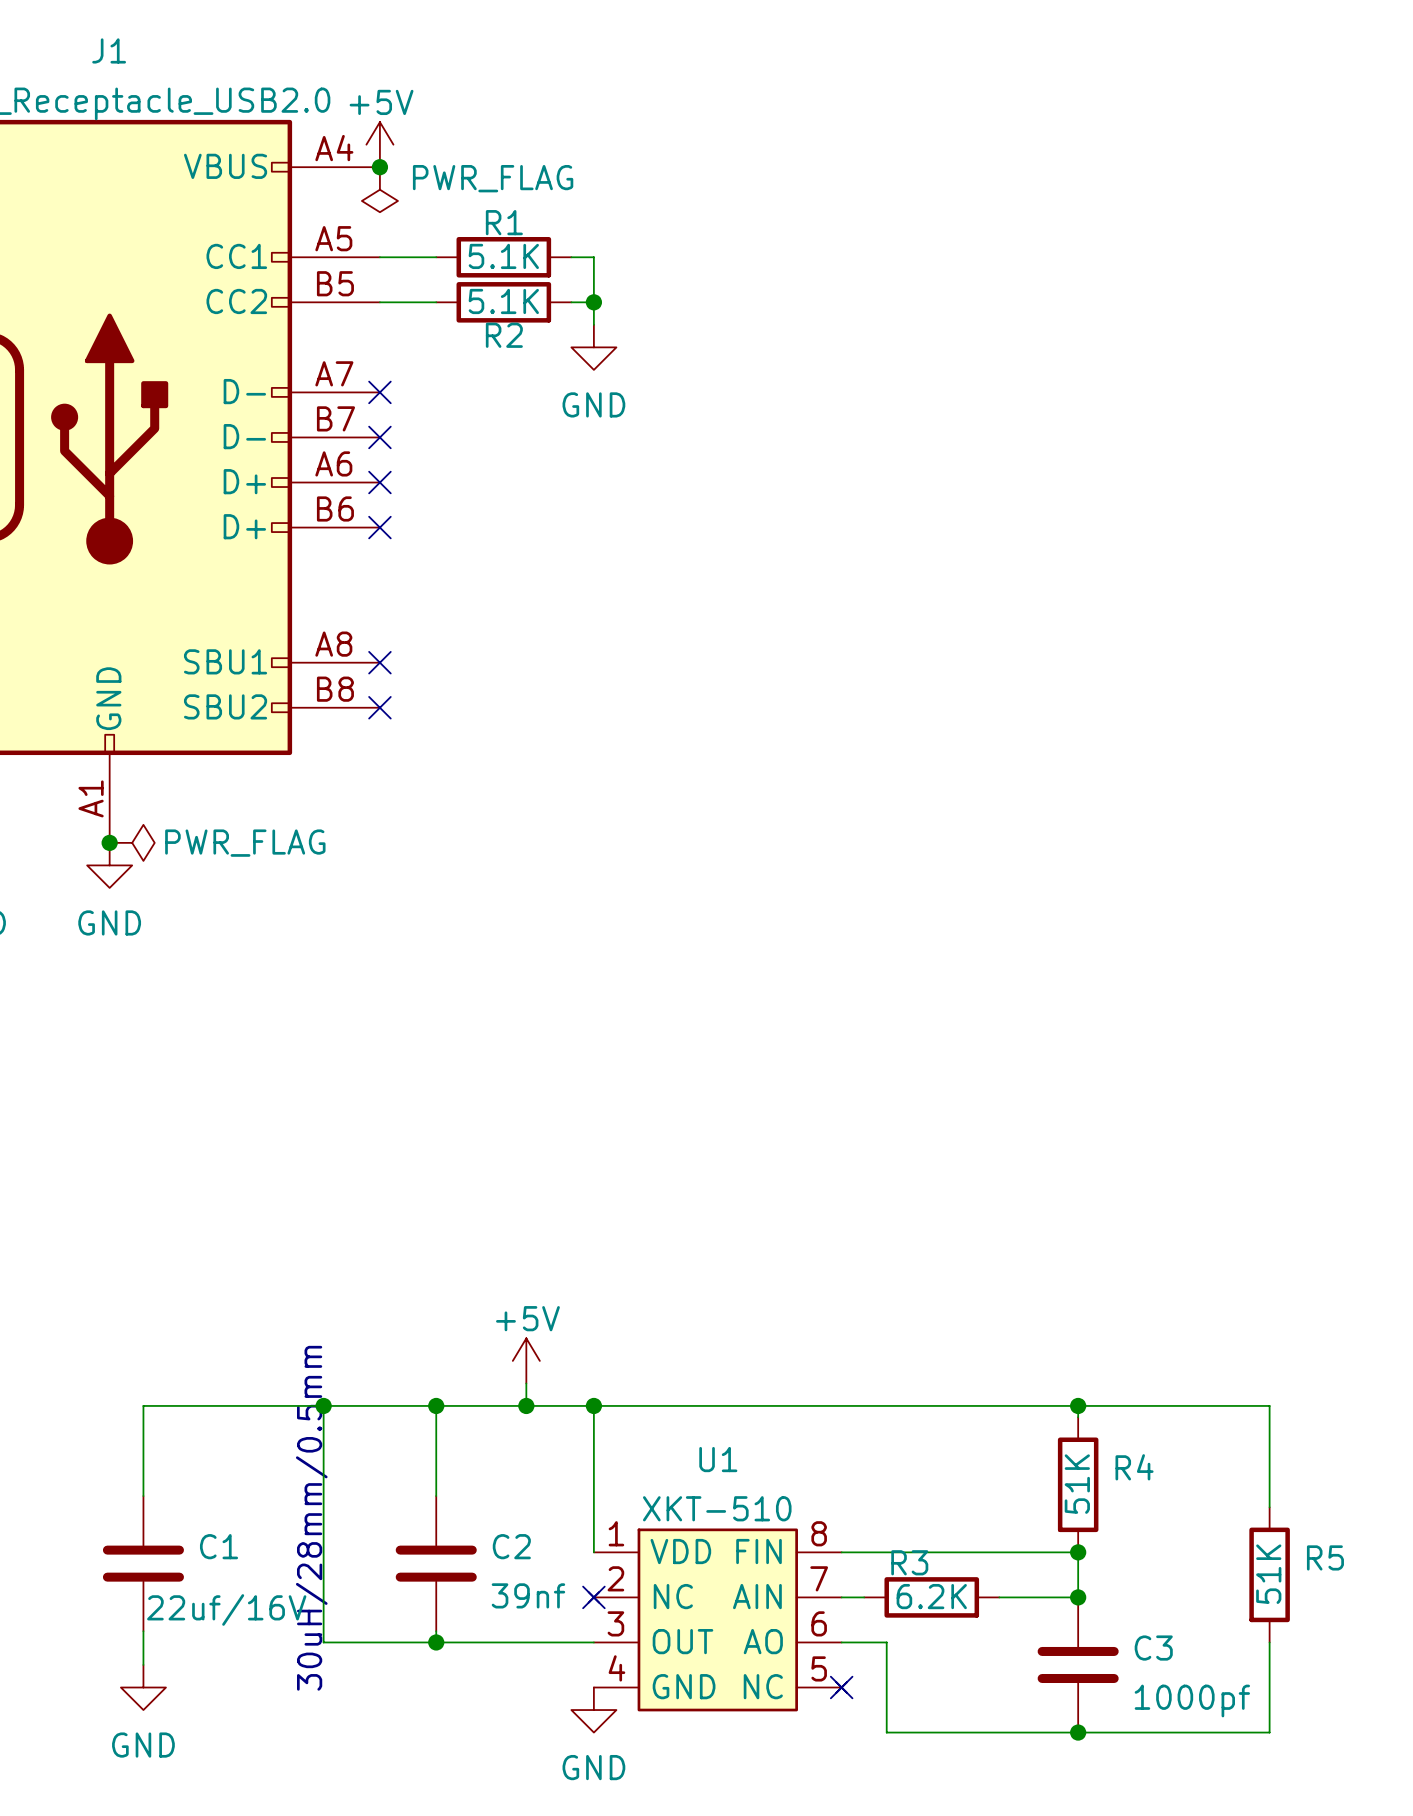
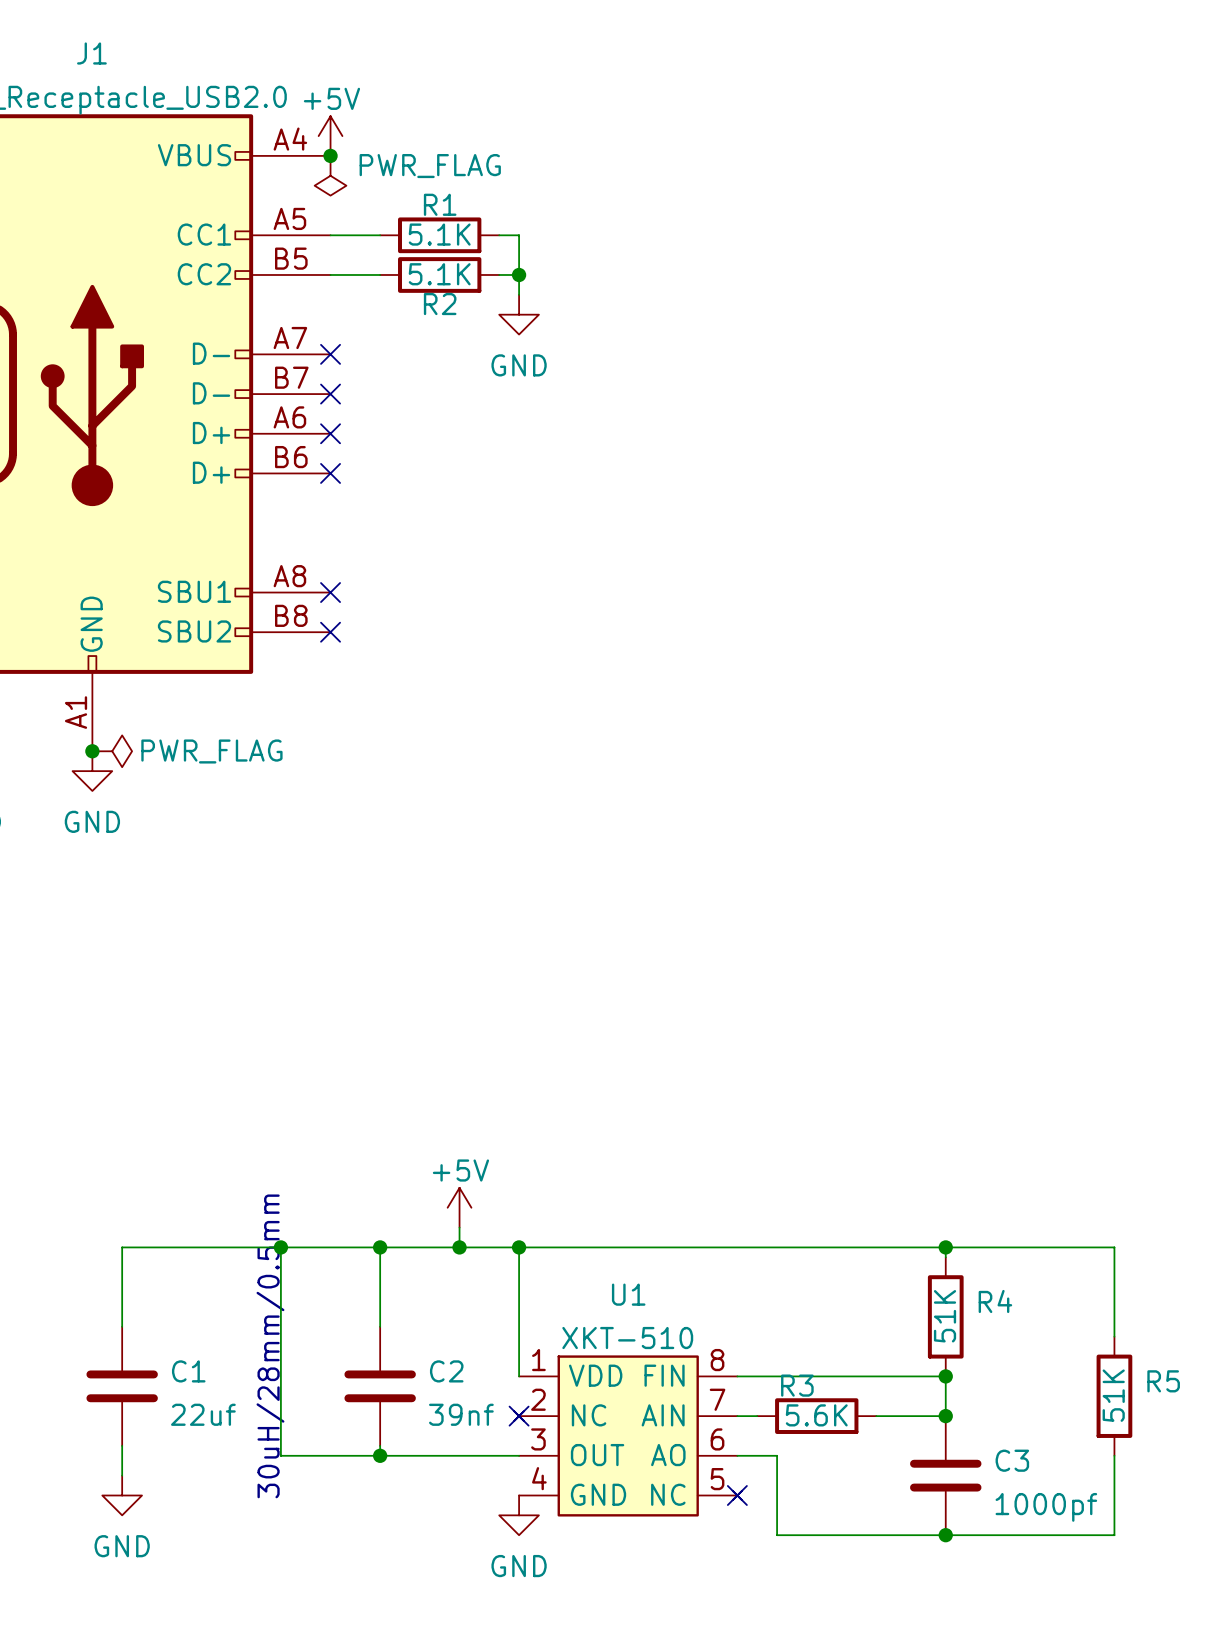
R3 value: 6.2K (931, 1596) -> 5.6K (816, 1415)
C1 value: 22uf/16V (226, 1609) -> 22uf (203, 1414)

